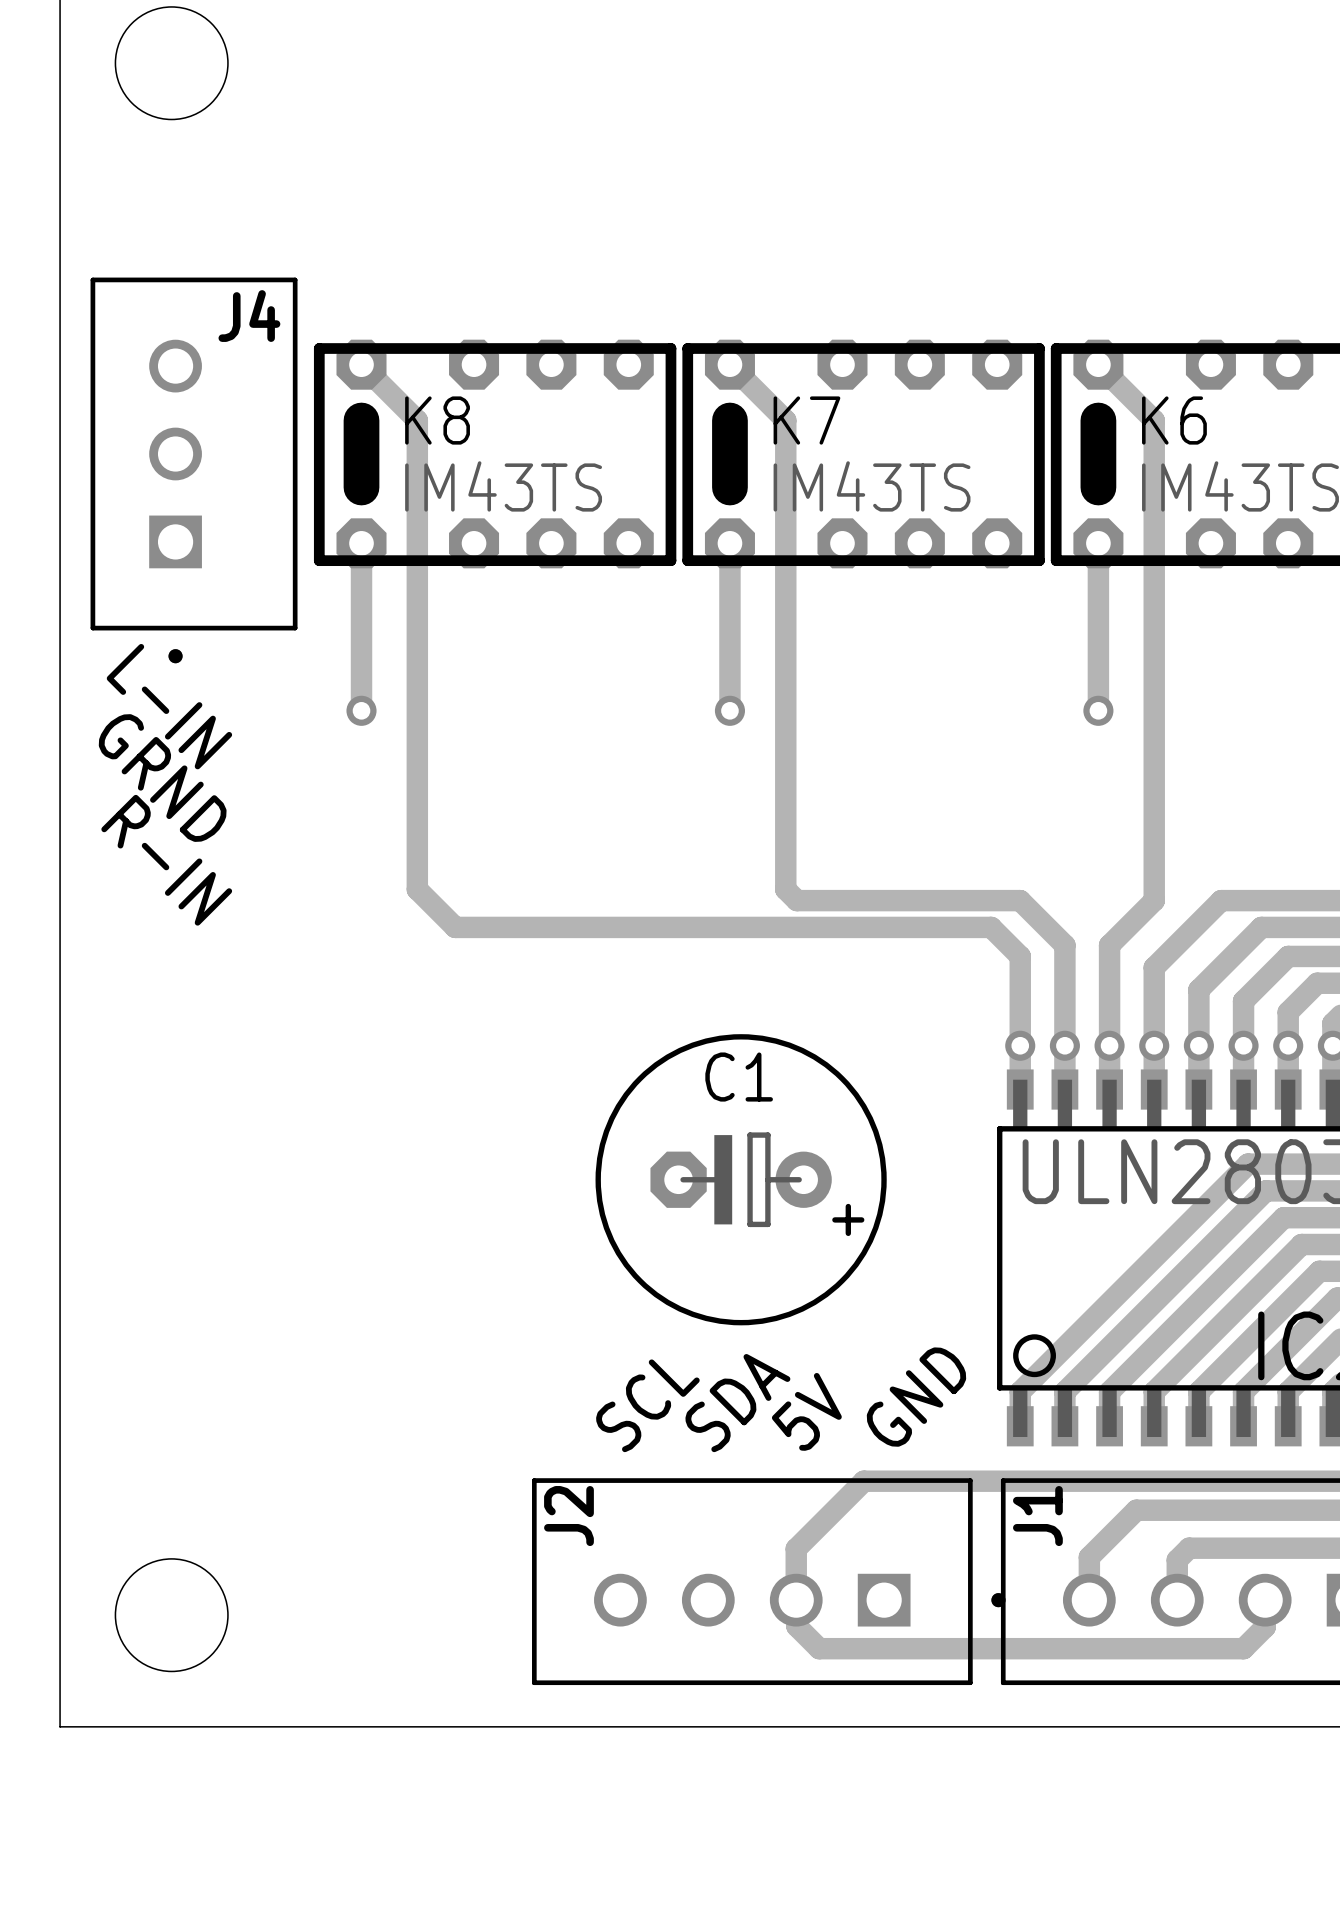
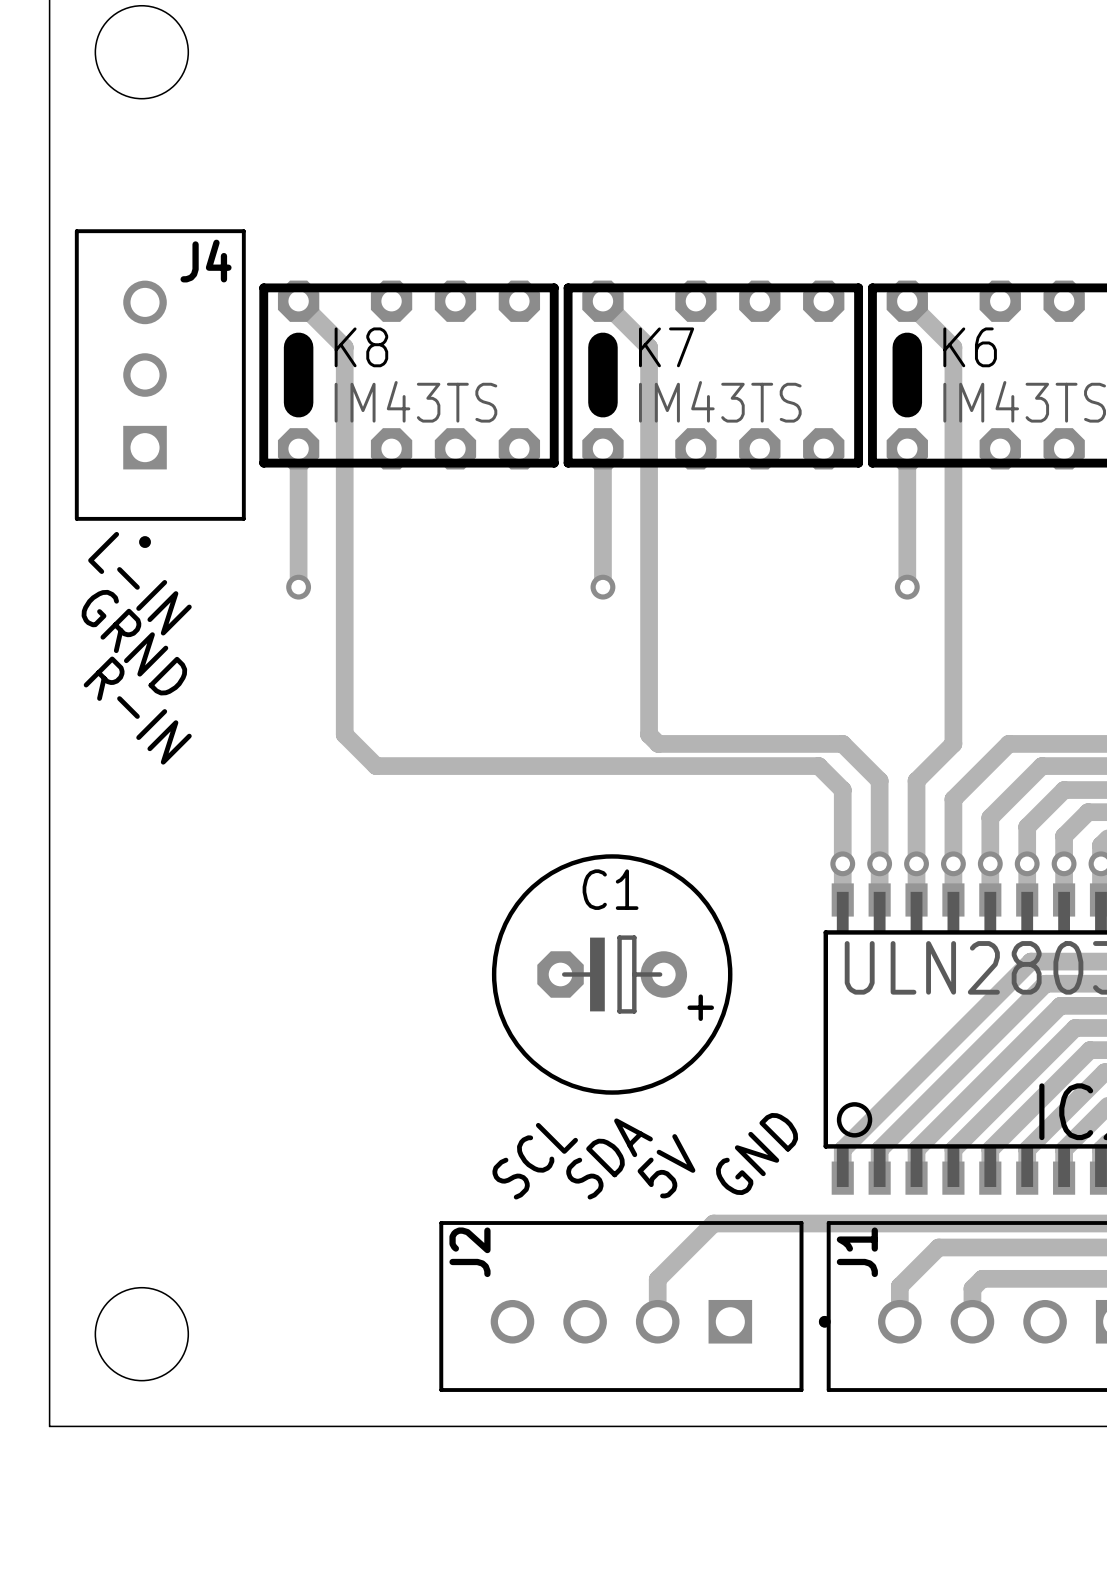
track: (796, 1600) (796, 1626) (819, 1648) (1243, 1648) (1265, 1627) (1265, 1600) -> none

